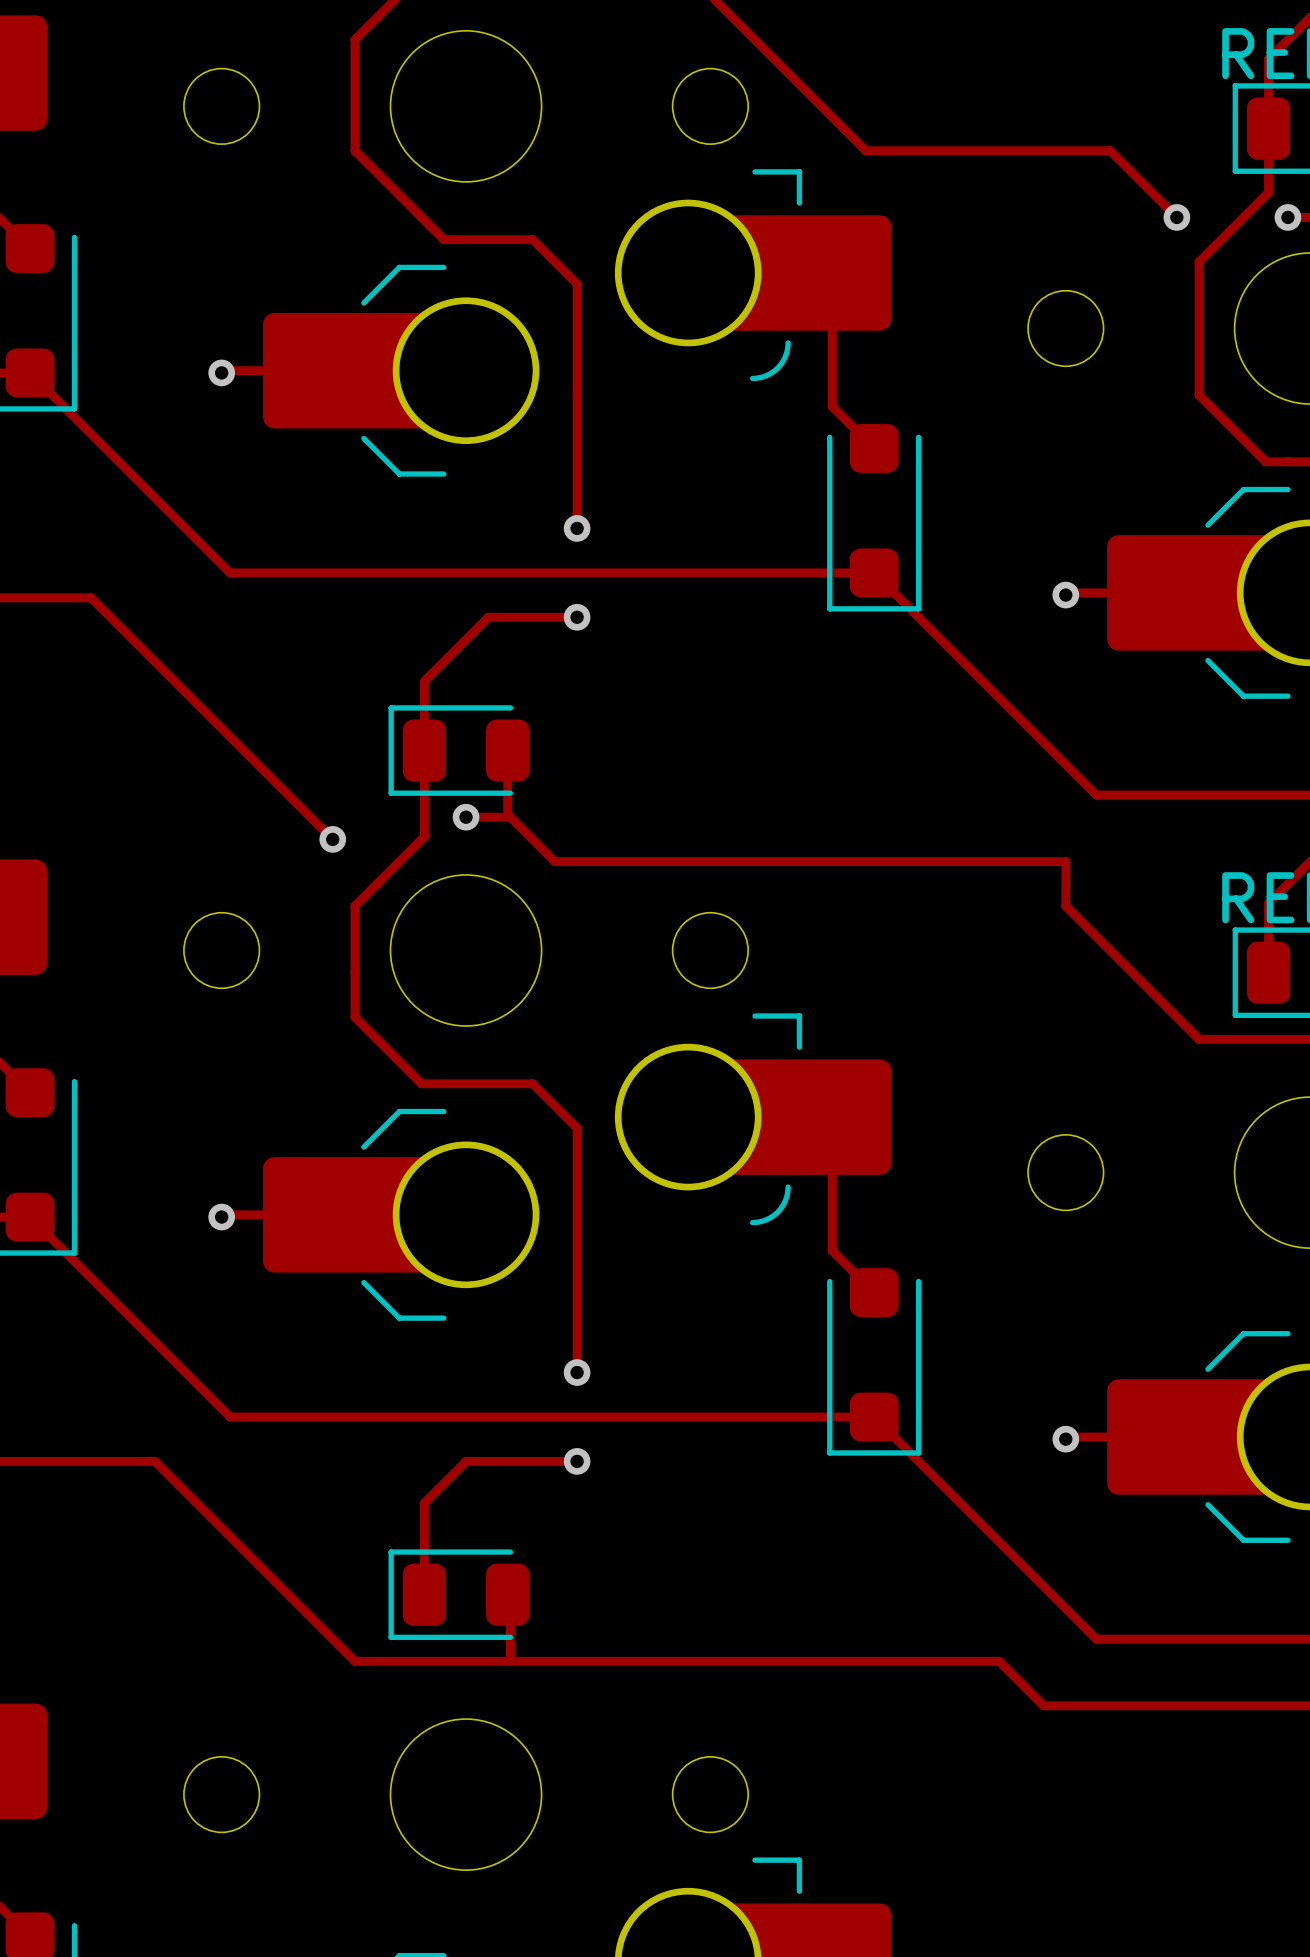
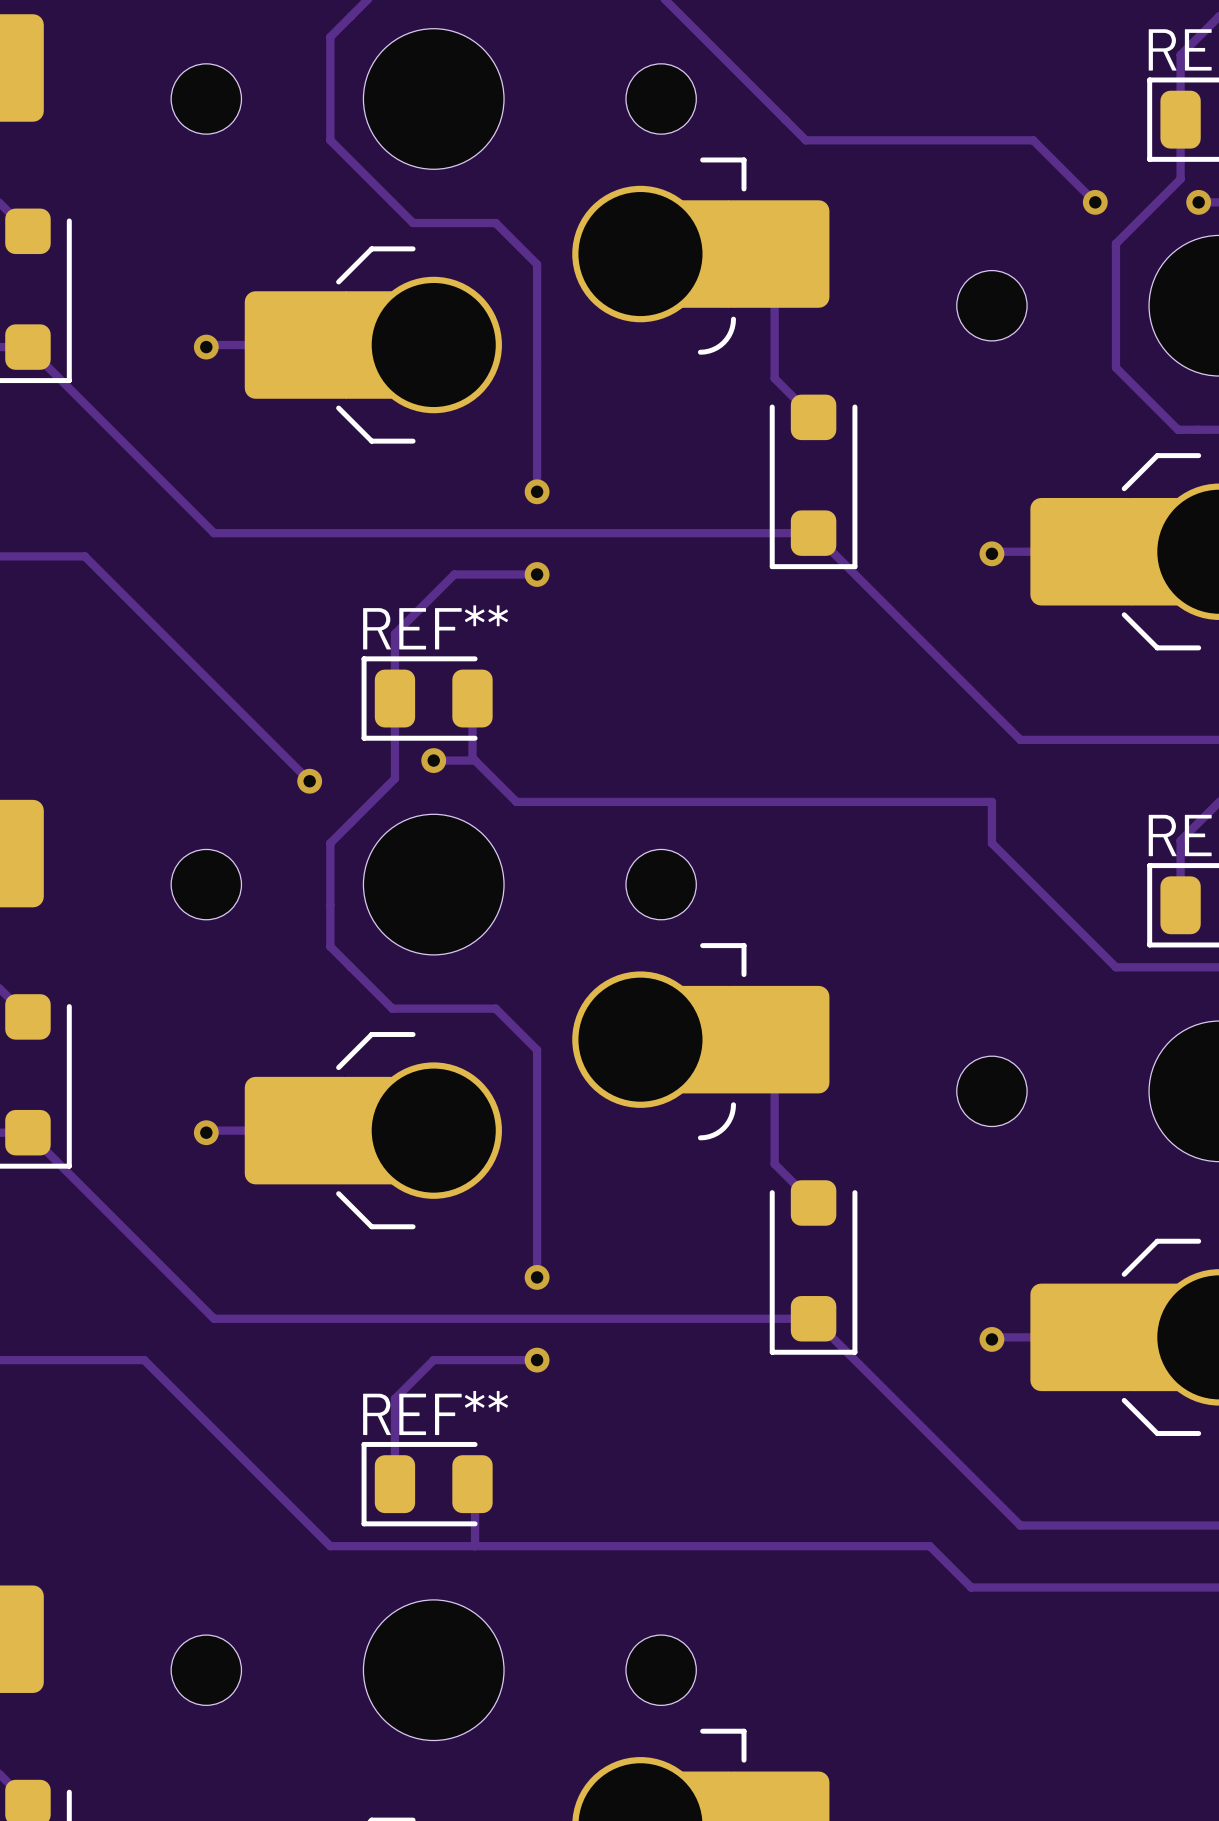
REF** name: none -> REF** (435, 627)
REF** name: none -> REF** (435, 1412)

